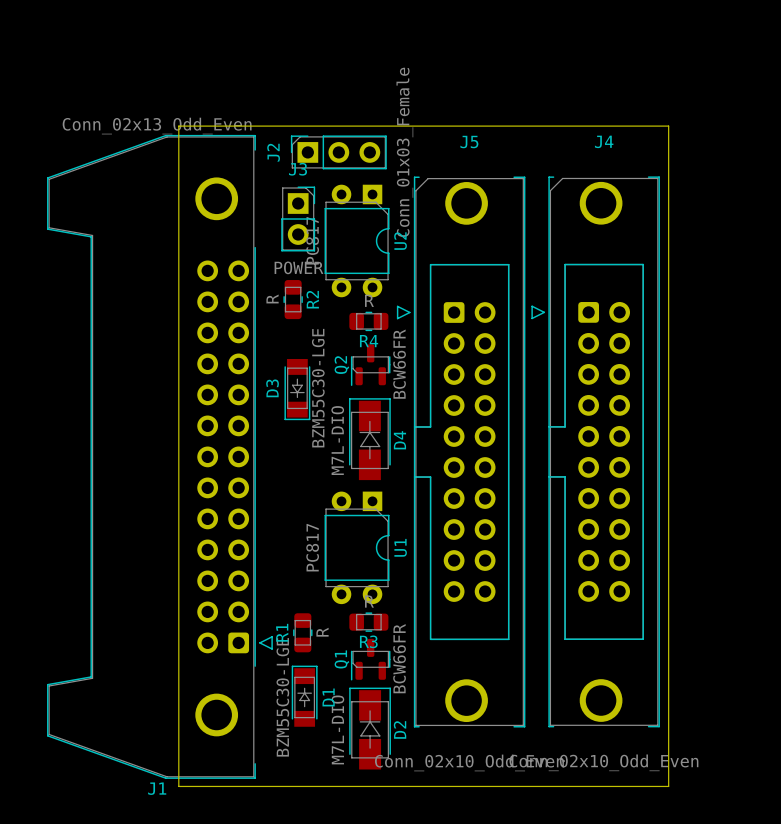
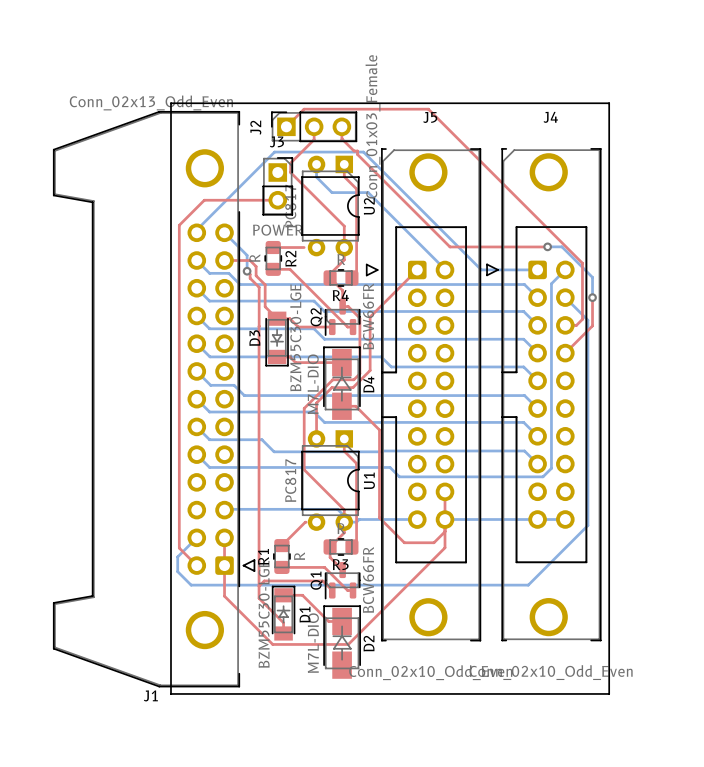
top track: none -> (286, 126) (304, 109) (428, 109) (582, 263) (582, 319) (576, 325) (565, 325)
top track: none -> (314, 126) (314, 139) (290, 163) (290, 172) (344, 226) (344, 259) (330, 274) (330, 277) (342, 290) (342, 306) (348, 306) (359, 318) (359, 373) (353, 379) (332, 379) (304, 408) (304, 469) (344, 509) (344, 532) (330, 546) (330, 557) (342, 570)
top track: none -> (341, 126) (341, 139) (354, 151) (357, 151) (357, 154) (450, 246) (547, 246)
bottom track: none -> (316, 164) (316, 177) (332, 192) (368, 192) (445, 269)
top track: none -> (344, 164) (344, 176) (356, 189) (356, 273) (351, 277)
top track: none -> (277, 200) (204, 200) (179, 225) (179, 548) (196, 565)
bottom track: none -> (196, 232) (196, 229) (274, 152) (363, 152) (481, 269) (537, 269)
bottom track: none -> (224, 232) (247, 255) (247, 271)
bottom track: none -> (547, 246) (561, 246) (592, 277) (592, 297)
via: none -> (547, 246)
top track: none -> (273, 247) (304, 247)
bottom track: none -> (196, 260) (209, 273) (228, 273) (240, 284) (524, 284) (537, 297)
top track: none -> (224, 260) (250, 260) (256, 266) (256, 275) (265, 284) (265, 306) (277, 318) (289, 318) (298, 327) (332, 327)
top track: none -> (273, 269) (290, 269) (347, 327) (353, 327)
top track: none -> (417, 269) (370, 317) (370, 370) (353, 387) (331, 387) (316, 403) (316, 438)
bottom track: none -> (565, 269) (551, 283) (551, 468) (542, 476) (399, 476) (390, 467) (209, 467) (196, 454)
top track: none -> (247, 271) (250, 274) (250, 278) (259, 287) (259, 326)
via: none -> (247, 271)
bottom track: none -> (196, 288) (209, 301) (314, 301) (324, 311) (523, 311) (537, 325)
bottom track: none -> (565, 297) (587, 320) (587, 525) (528, 585) (191, 585) (177, 571) (177, 556) (196, 537)
top track: none -> (592, 297) (592, 325) (565, 353)
via: none -> (592, 297)
bottom track: none -> (196, 315) (209, 328) (314, 328) (324, 339) (523, 339) (537, 353)
top track: none -> (259, 326) (259, 598) (283, 622) (283, 633)
bottom track: none -> (196, 343) (209, 356) (381, 356) (391, 366) (523, 366) (537, 380)
top track: none -> (277, 356) (289, 356) (295, 362) (341, 362)
bottom track: none -> (196, 371) (210, 385) (234, 385) (244, 395) (524, 395) (537, 408)
bottom track: none -> (196, 399) (209, 412) (314, 412) (324, 422) (523, 422) (537, 436)
top track: none -> (341, 406) (355, 406) (379, 429) (379, 517) (404, 542) (433, 542) (445, 531)
bottom track: none -> (196, 426) (209, 439) (262, 439) (274, 451) (524, 450) (537, 464)
top track: none -> (344, 438) (344, 451) (356, 463) (356, 542) (351, 546)
top track: none -> (445, 491) (445, 547) (348, 644) (272, 644) (224, 596) (224, 537)
bottom track: none -> (224, 510) (337, 509) (350, 522)
bottom track: none -> (417, 519) (359, 519) (356, 522) (344, 522)
bottom track: none -> (445, 519) (565, 519)
top track: none -> (306, 522) (281, 545)
top track: none -> (281, 567) (324, 567) (347, 590) (353, 590)
top track: none -> (259, 586) (264, 580) (322, 580) (332, 590)
top track: none -> (283, 595) (302, 595) (328, 621) (342, 621)

